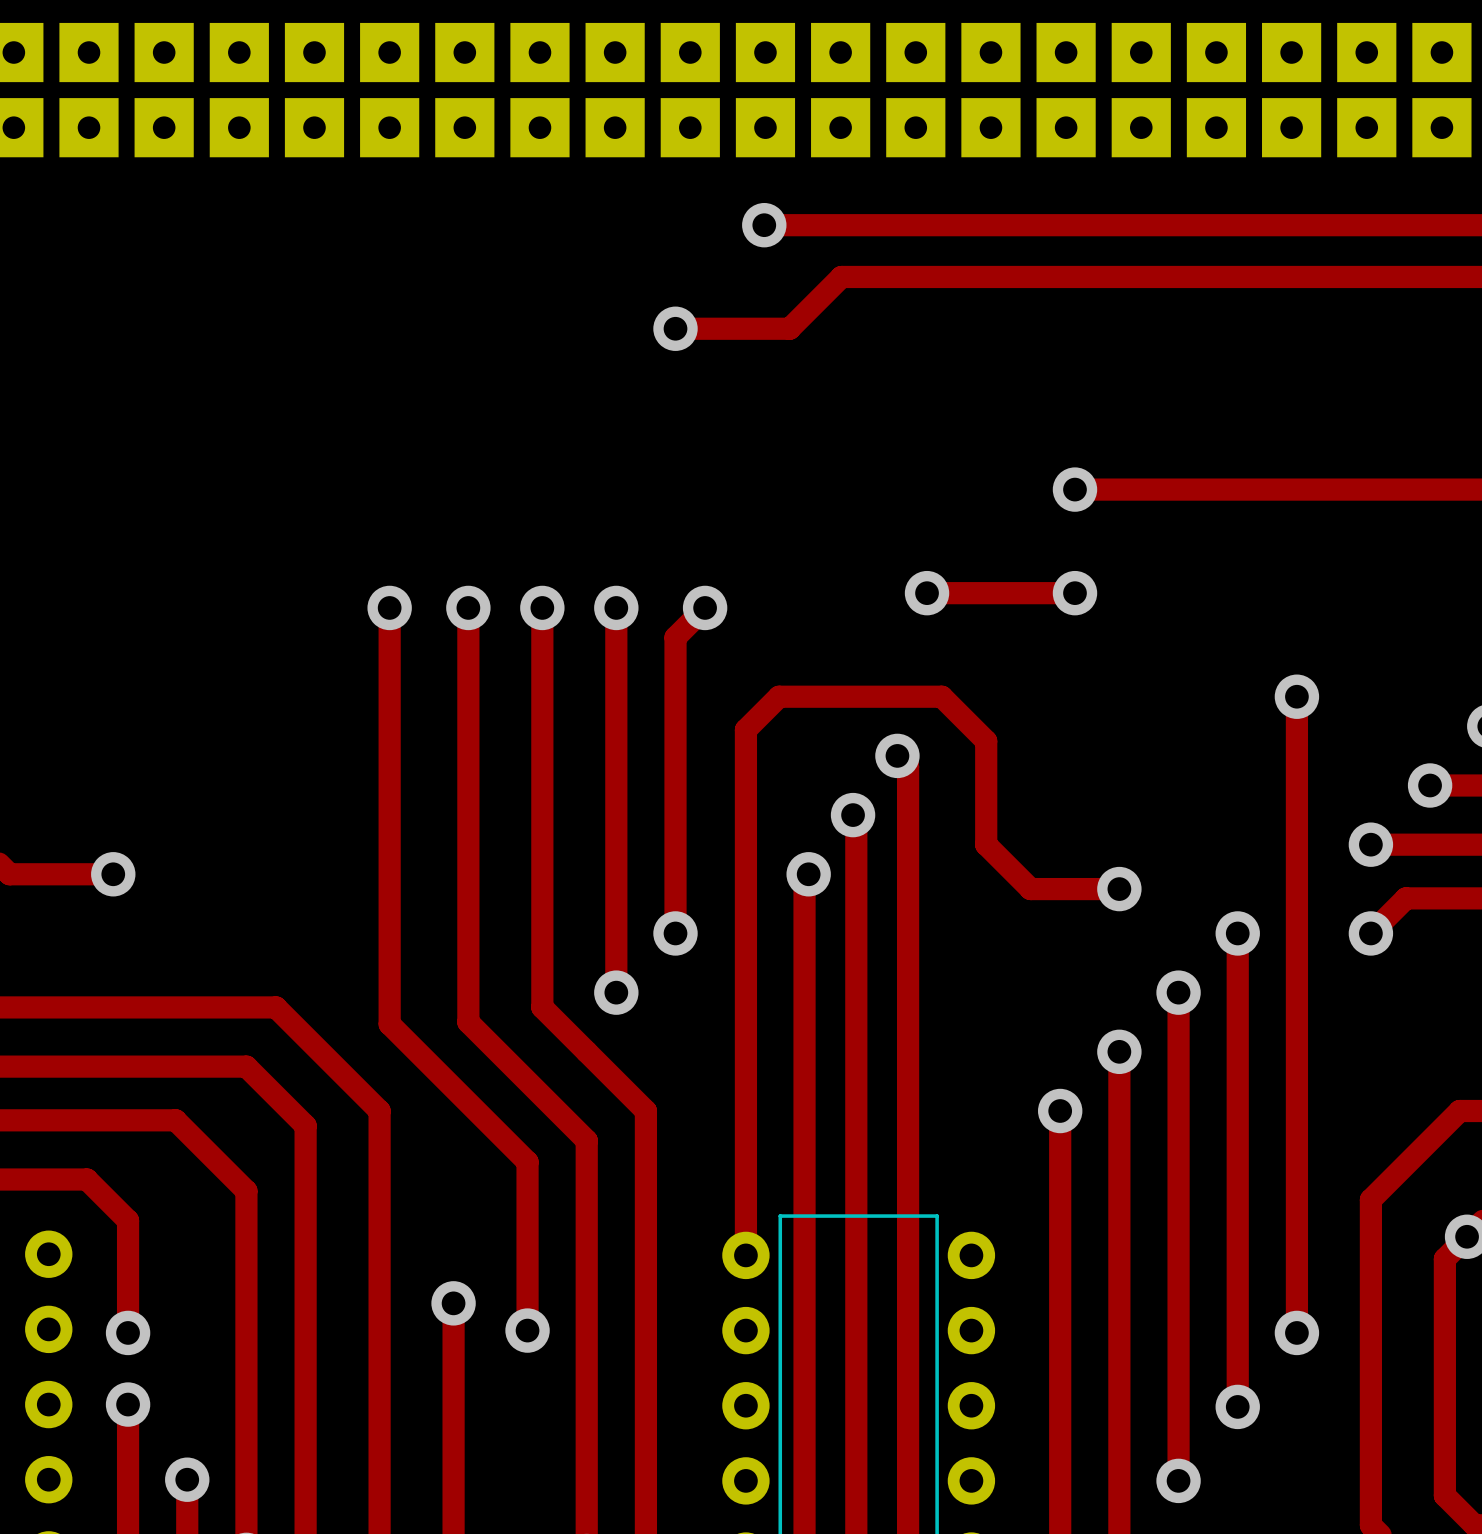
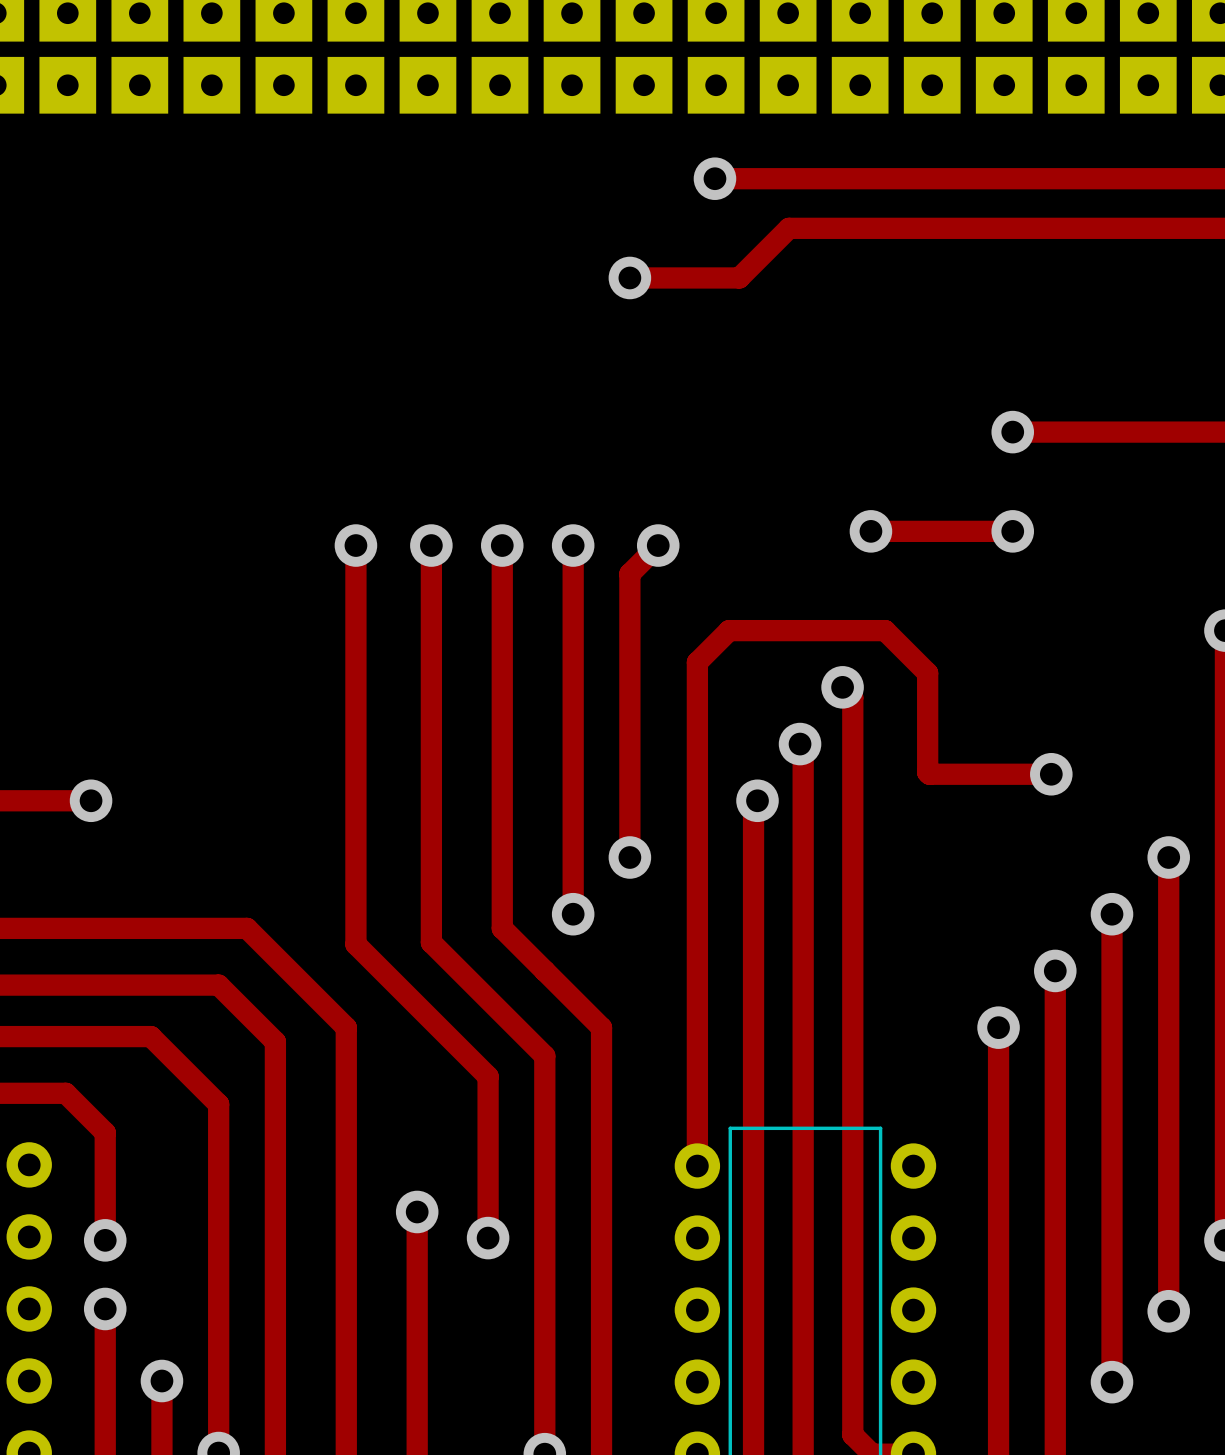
track: (988, 846) (1030, 889) (1119, 889) -> (929, 774) (1051, 774)
via position: (1119, 889) -> (1051, 774)

